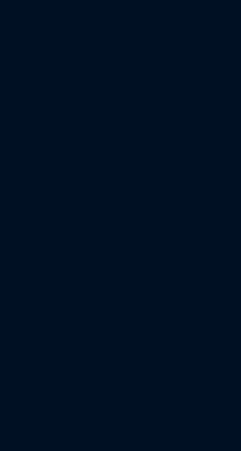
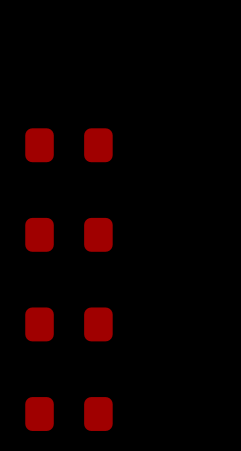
part: none -> (68, 145)
part: none -> (68, 234)
part: none -> (68, 324)
part: none -> (68, 414)

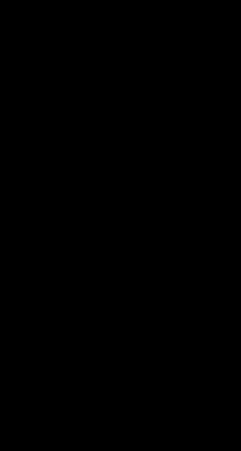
part: (68, 145) -> none
part: (68, 234) -> none
part: (68, 324) -> none
part: (68, 414) -> none

